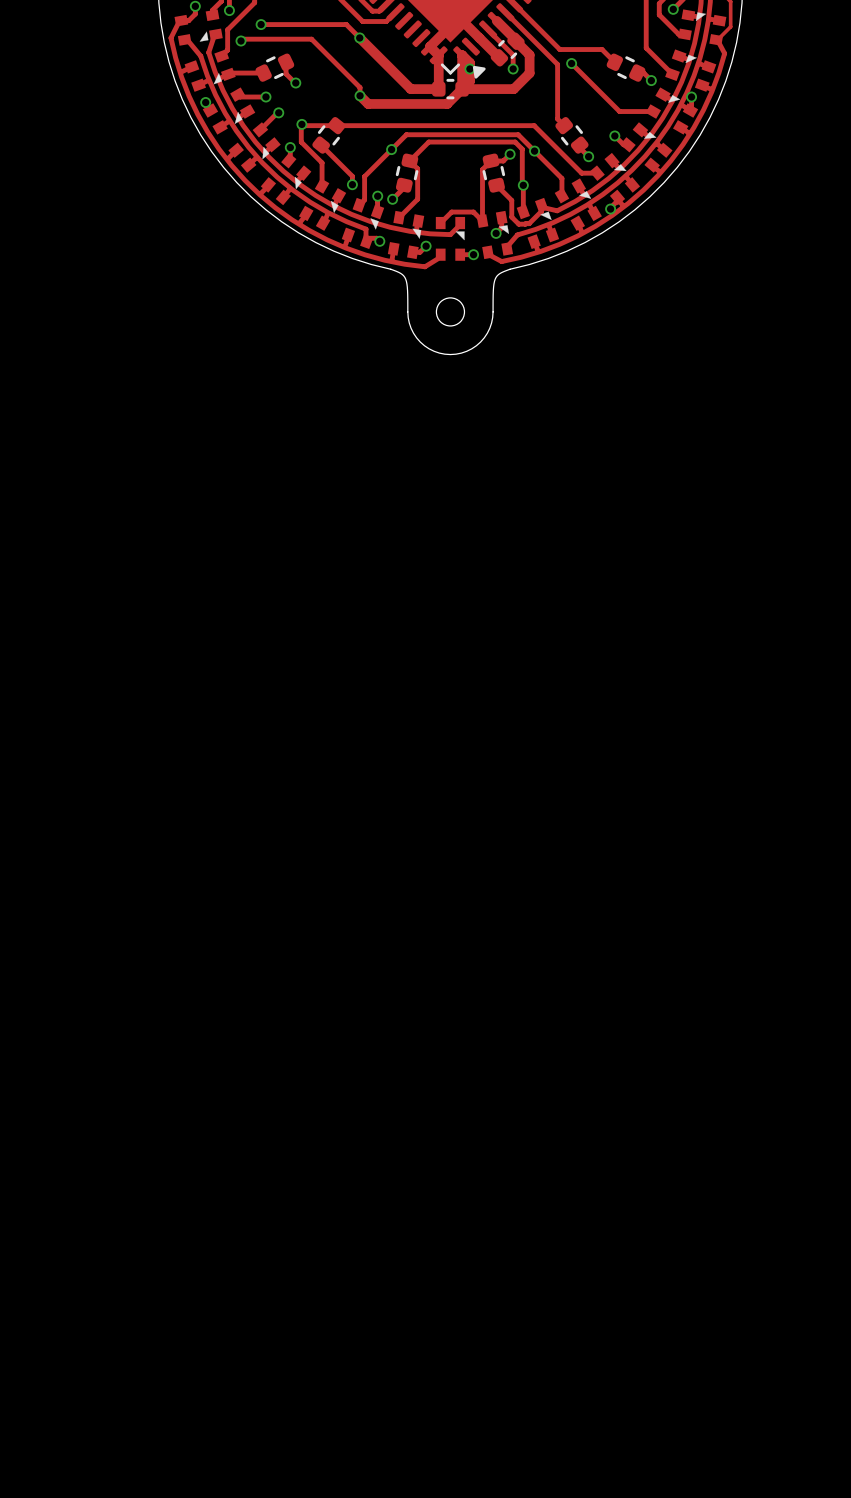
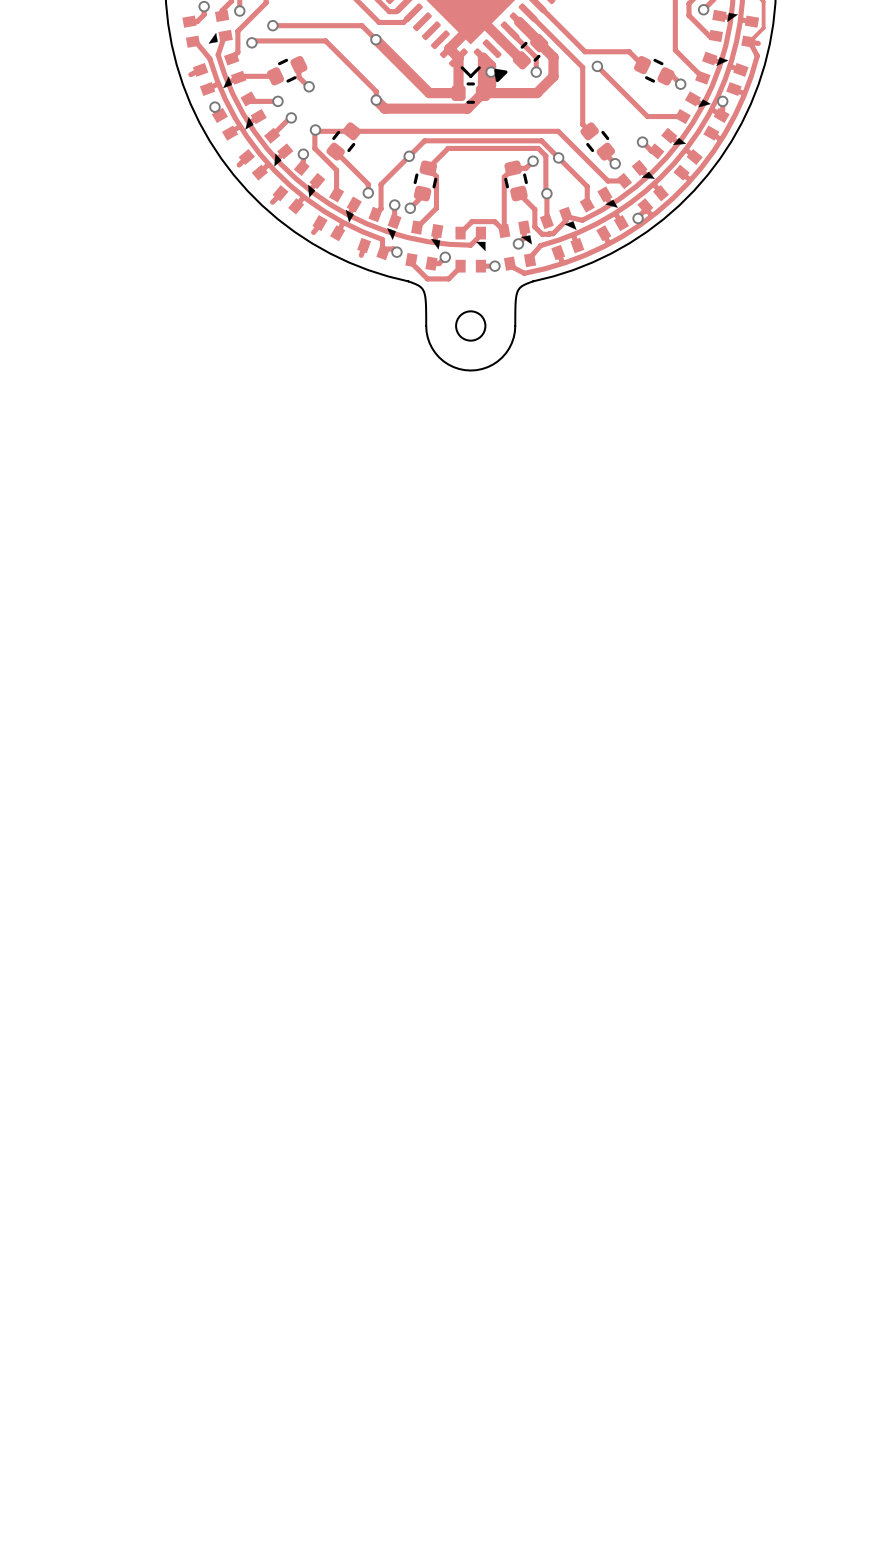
track: (177, 24) (170, 37) (181, 77) (197, 114) (219, 149) (259, 194) (309, 230) (345, 248) (384, 260) (424, 266) (437, 258) -> none
track: none -> (750, 42) (758, 43)
track: none -> (411, 260) (411, 262) (427, 278) (448, 278) (460, 266)
track: (393, 252) (392, 260) -> none

